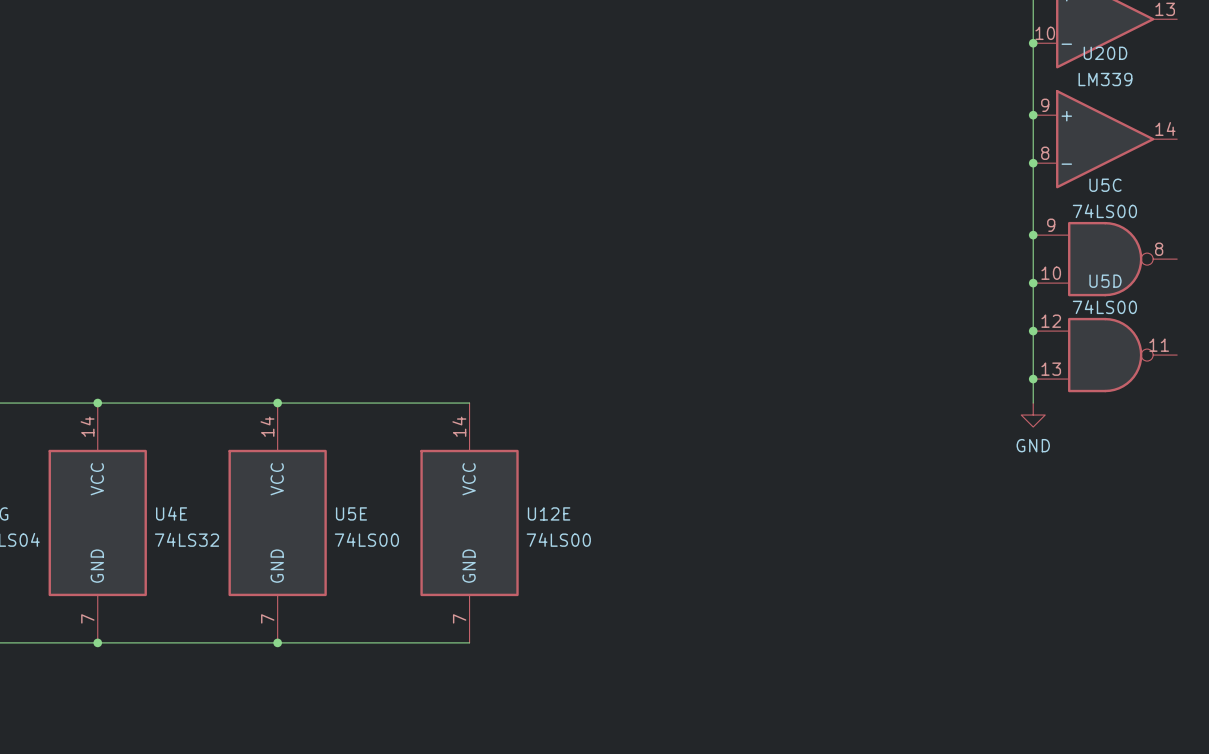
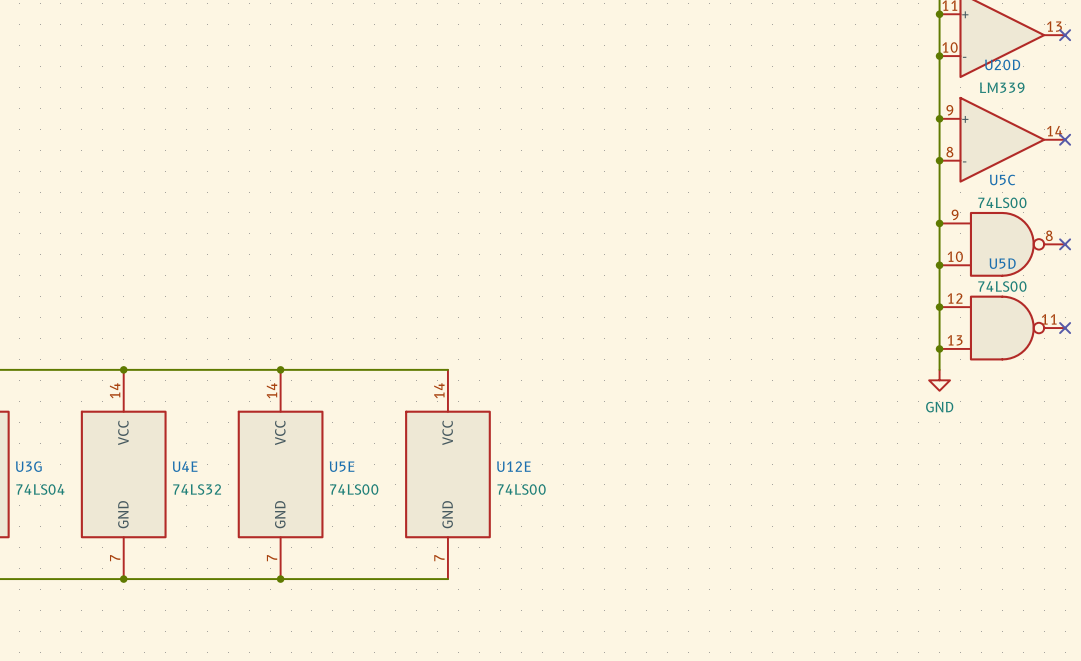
no-connect mark: none -> (1065, 35)
no-connect mark: none -> (1065, 139)
no-connect mark: none -> (1065, 244)
no-connect mark: none -> (1065, 328)

